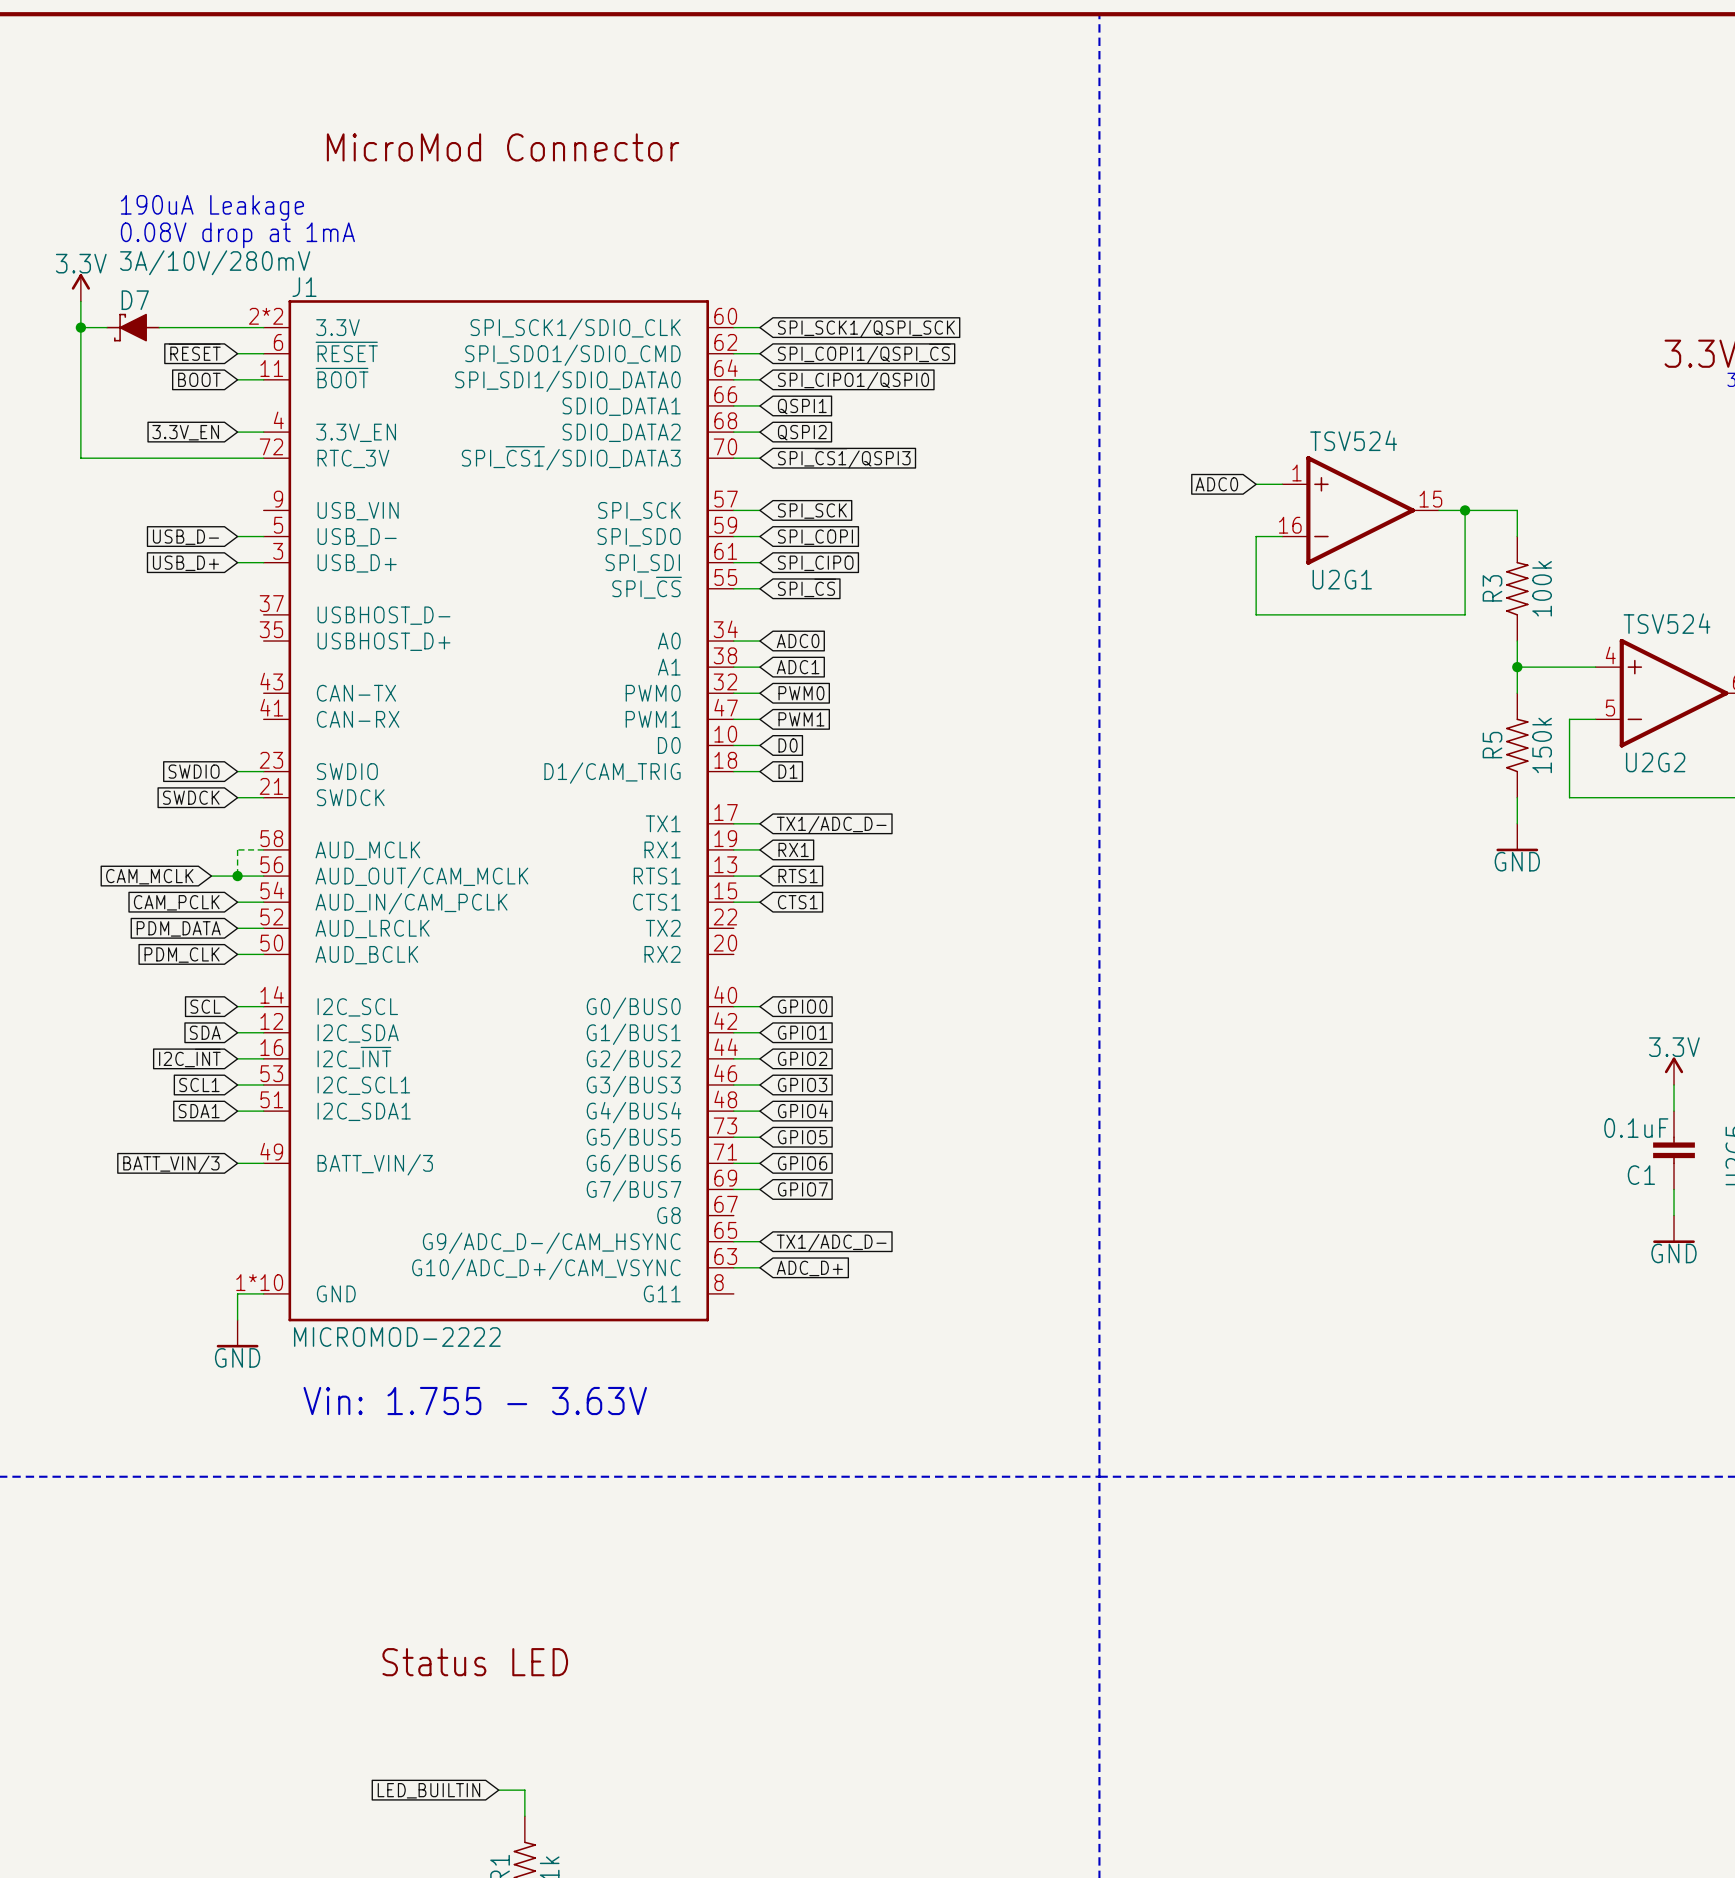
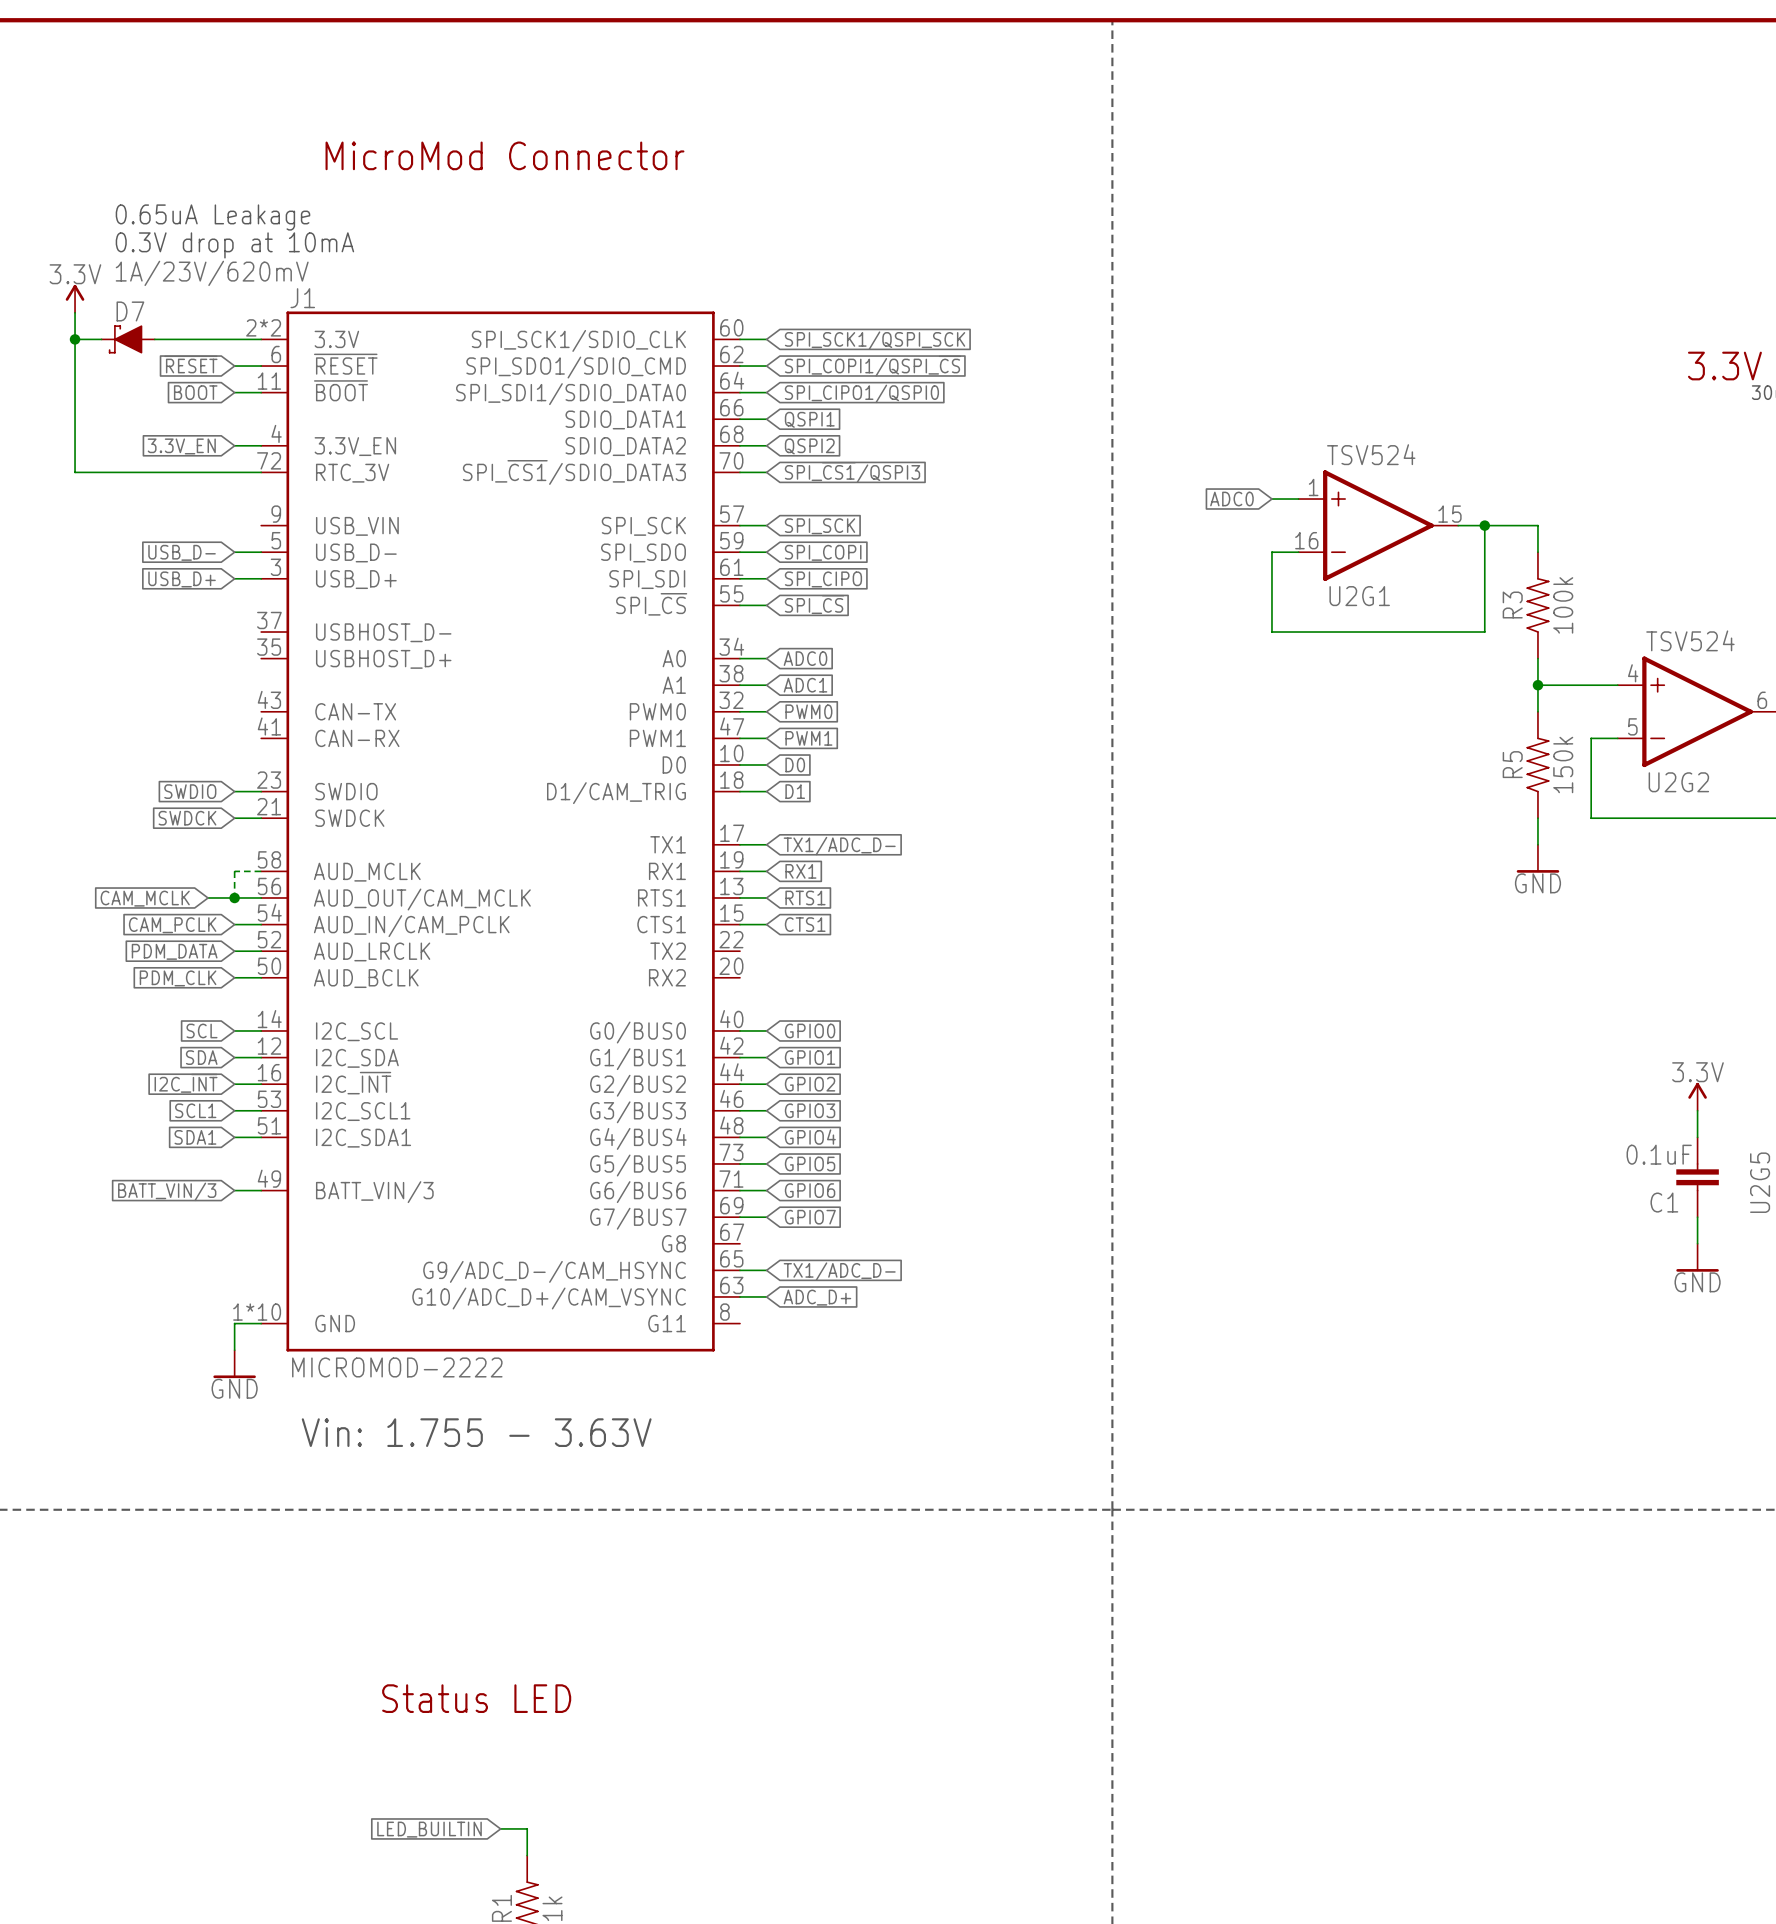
text: 190uA Leakage (212, 207) -> 0.65uA Leakage (212, 217)
text: 0.08V drop at 1mA (237, 235) -> 0.3V drop at 10mA (234, 245)
D7 value: 3A/10V/280mV (215, 262) -> 1A/23V/620mV (212, 273)

